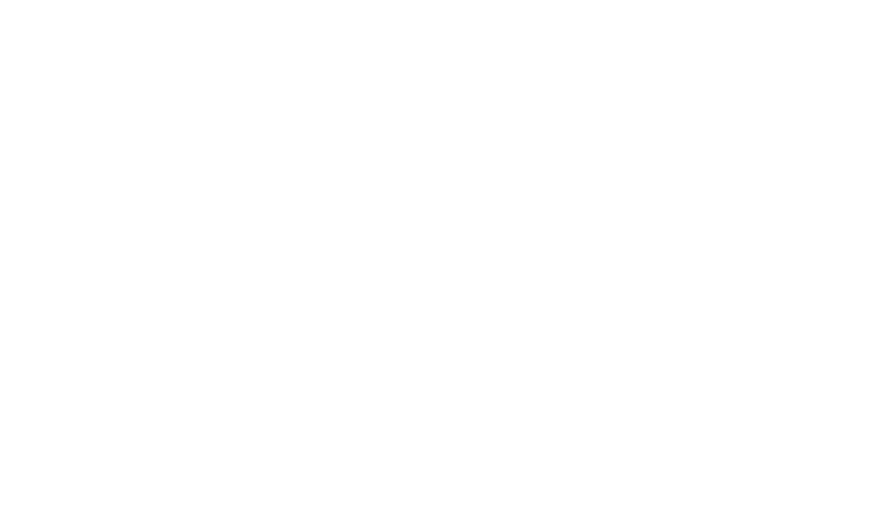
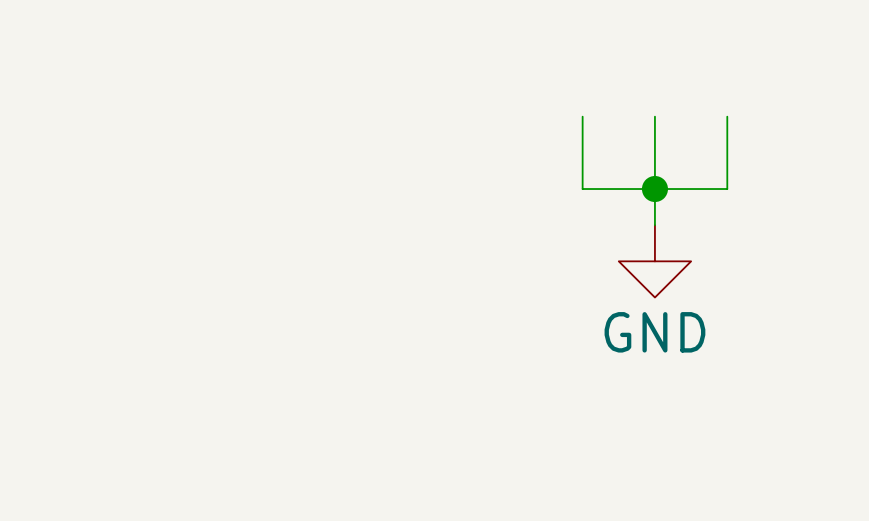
wire: none -> (582, 116) (582, 189) (727, 189) (727, 116)
wire: none -> (654, 116) (654, 225)
junction: none -> (654, 189)
power symbol: none -> GND (654, 261)

